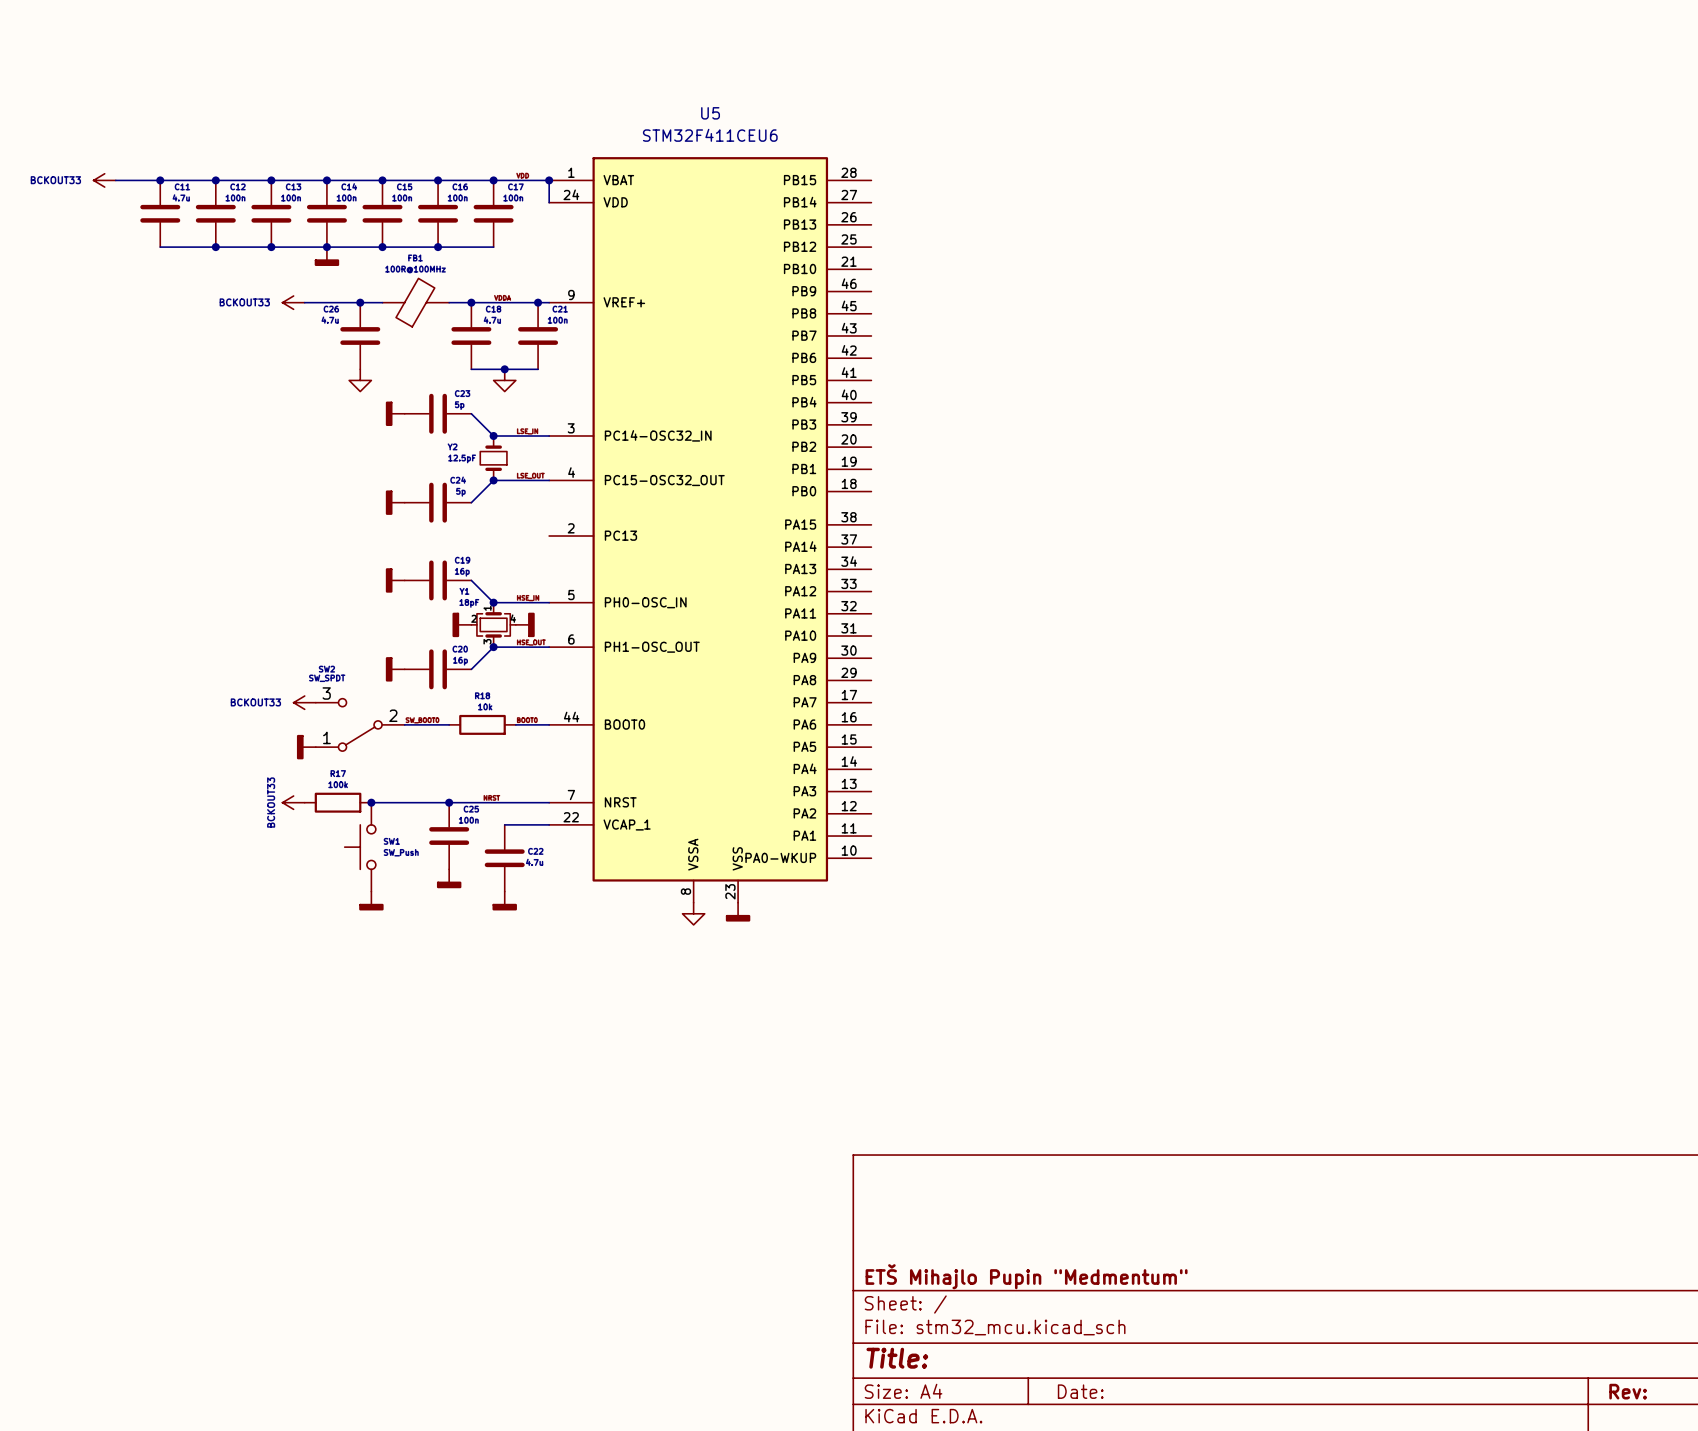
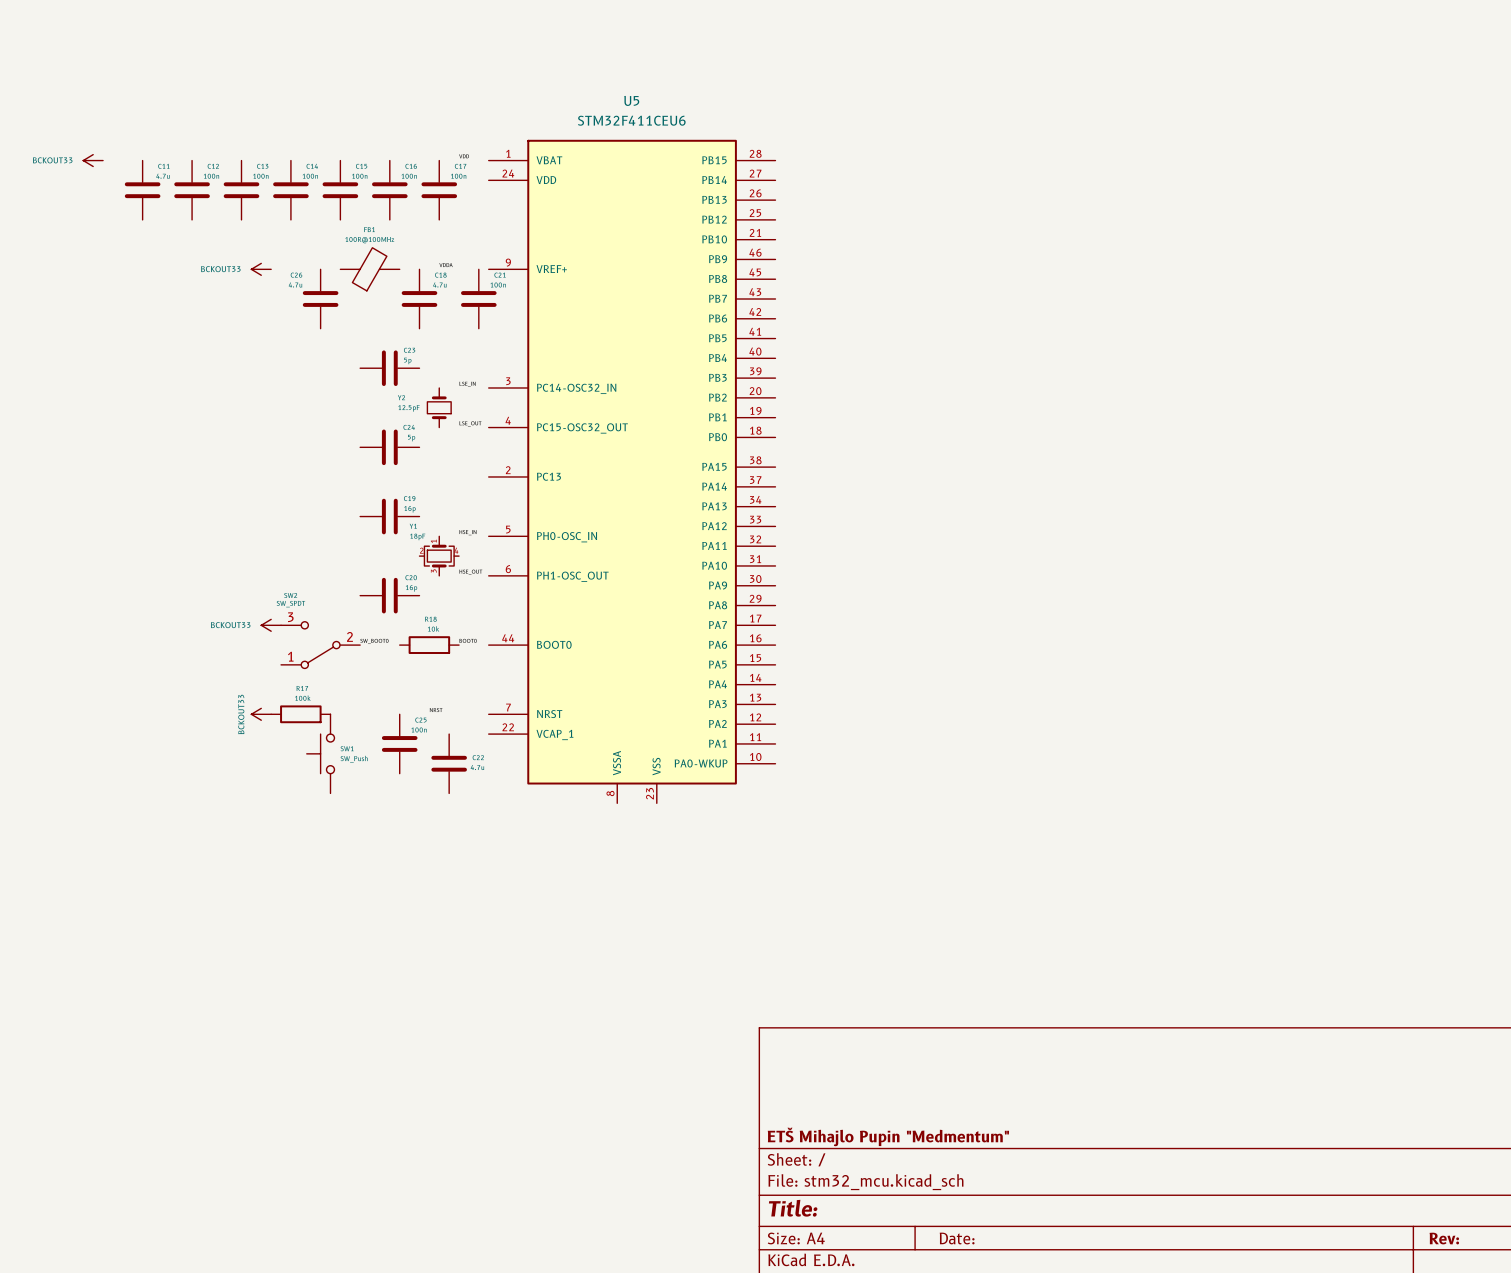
wire: (115, 180) (549, 180) (549, 202) -> none
junction: (160, 180) -> none
junction: (215, 180) -> none
junction: (271, 180) -> none
junction: (326, 180) -> none
junction: (382, 180) -> none
junction: (438, 180) -> none
junction: (493, 180) -> none
junction: (549, 180) -> none
wire: (160, 247) (493, 247) -> none
junction: (215, 247) -> none
junction: (271, 247) -> none
junction: (326, 247) -> none
junction: (382, 247) -> none
junction: (438, 247) -> none
power symbol: (326, 256) -> none
wire: (304, 302) (382, 302) -> none
junction: (360, 302) -> none
wire: (449, 302) (549, 302) -> none
junction: (471, 302) -> none
junction: (538, 302) -> none
wire: (471, 369) (538, 369) -> none
junction: (504, 369) -> none
power symbol: (360, 380) -> none
power symbol: (504, 380) -> none
power symbol: (395, 413) -> none
wire: (471, 413) (493, 436) (549, 436) -> none
junction: (493, 436) -> none
junction: (493, 480) -> none
wire: (549, 480) (493, 480) (471, 502) -> none
power symbol: (395, 502) -> none
power symbol: (395, 580) -> none
wire: (471, 580) (493, 602) (549, 602) -> none
junction: (493, 602) -> none
power symbol: (461, 624) -> none
power symbol: (525, 624) -> none
junction: (493, 647) -> none
wire: (549, 647) (493, 647) (471, 669) -> none
power symbol: (395, 669) -> none
wire: (404, 724) (449, 724) -> none
wire: (515, 724) (549, 724) -> none
power symbol: (306, 747) -> none
wire: (371, 802) (549, 802) -> none
junction: (371, 802) -> none
junction: (449, 802) -> none
wire: (504, 824) (549, 824) -> none
power symbol: (449, 878) -> none
power symbol: (371, 901) -> none
power symbol: (504, 901) -> none
power symbol: (738, 912) -> none
power symbol: (693, 913) -> none

